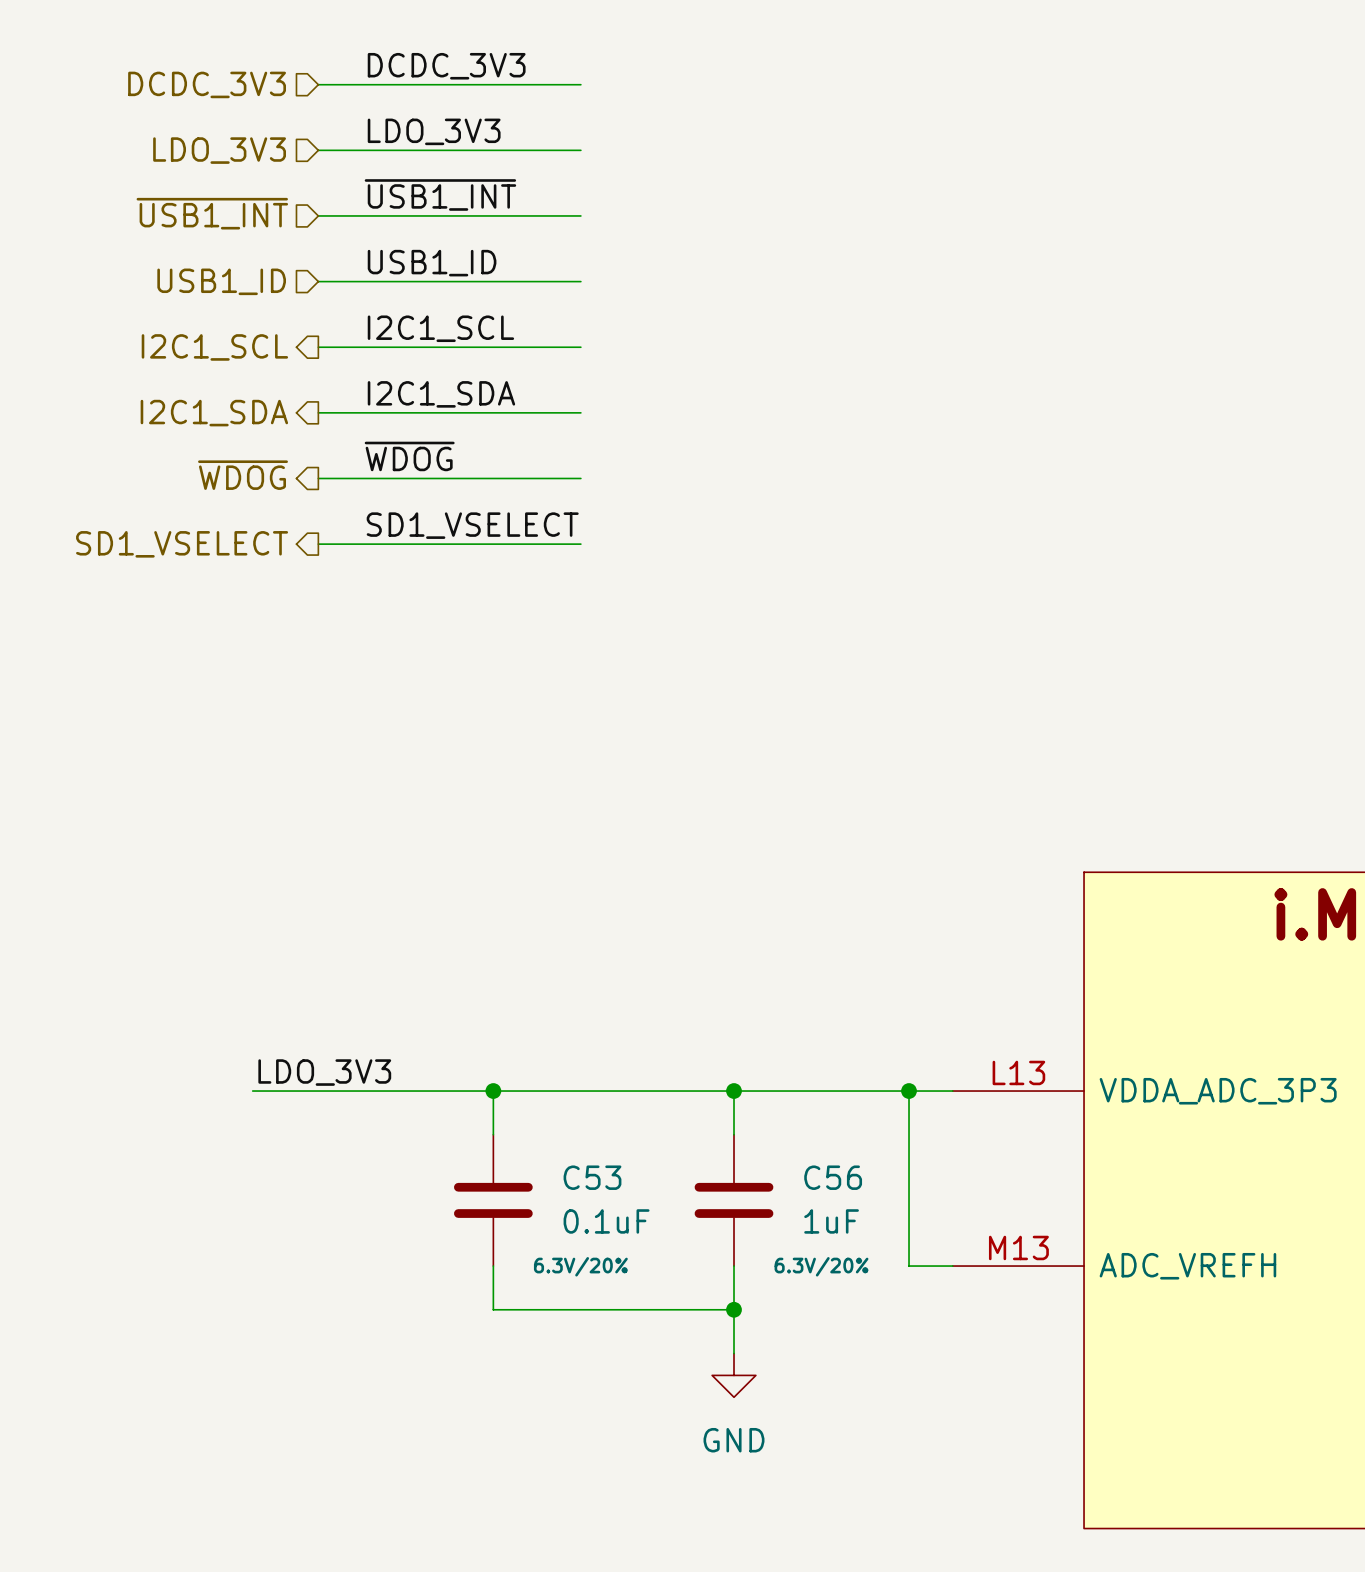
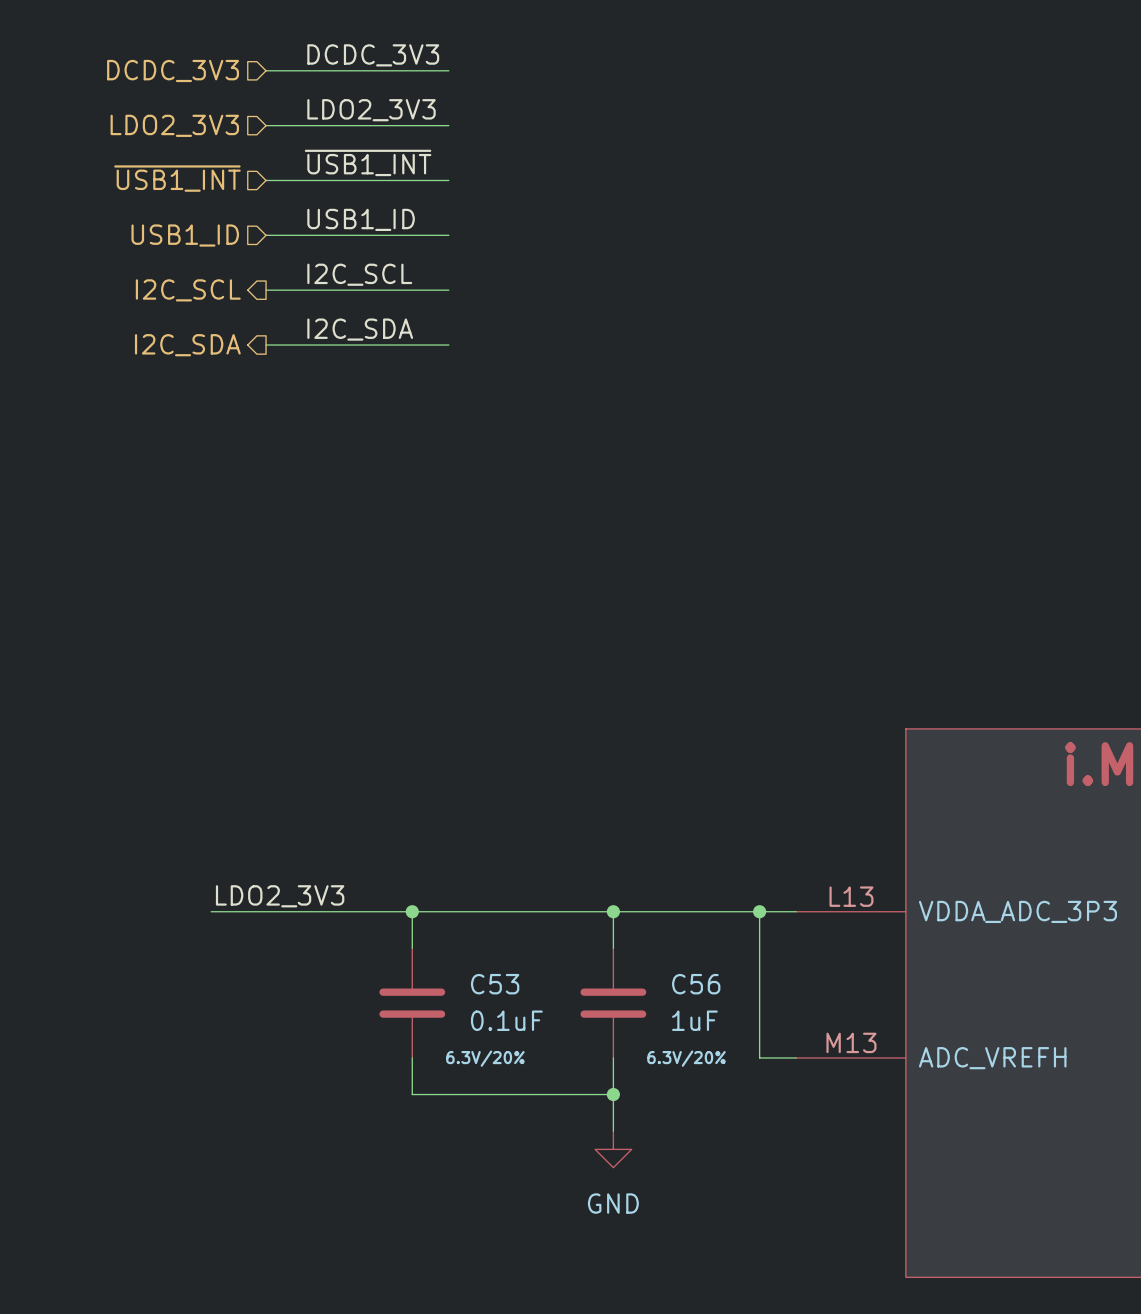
wire: (537, 84) (580, 84) -> none
label: LDO_3V3 (434, 131) -> LDO2_3V3 (371, 110)
hierarchical label: LDO_3V3 (219, 150) -> LDO2_3V3 (174, 125)
wire: (537, 150) (580, 150) -> none
wire: (537, 215) (580, 215) -> none
wire: (537, 281) (580, 281) -> none
label: I2C1_SCL (440, 328) -> I2C_SCL (359, 274)
hierarchical label: I2C1_SCL (214, 347) -> I2C_SCL (188, 290)
wire: (537, 347) (580, 347) -> none
label: I2C1_SDA (441, 394) -> I2C_SDA (360, 329)
wire: (537, 412) (580, 412) -> none
hierarchical label: I2C1_SDA (214, 413) -> I2C_SDA (187, 345)
label: ~{WDOG} (409, 456) -> none
hierarchical label: ~{WDOG} (243, 475) -> none
wire: (318, 478) (580, 478) -> none
label: SD1_VSELECT (472, 525) -> none
hierarchical label: SD1_VSELECT (182, 544) -> none
wire: (318, 544) (580, 544) -> none
label: LDO_3V3 (324, 1072) -> LDO2_3V3 (280, 896)

